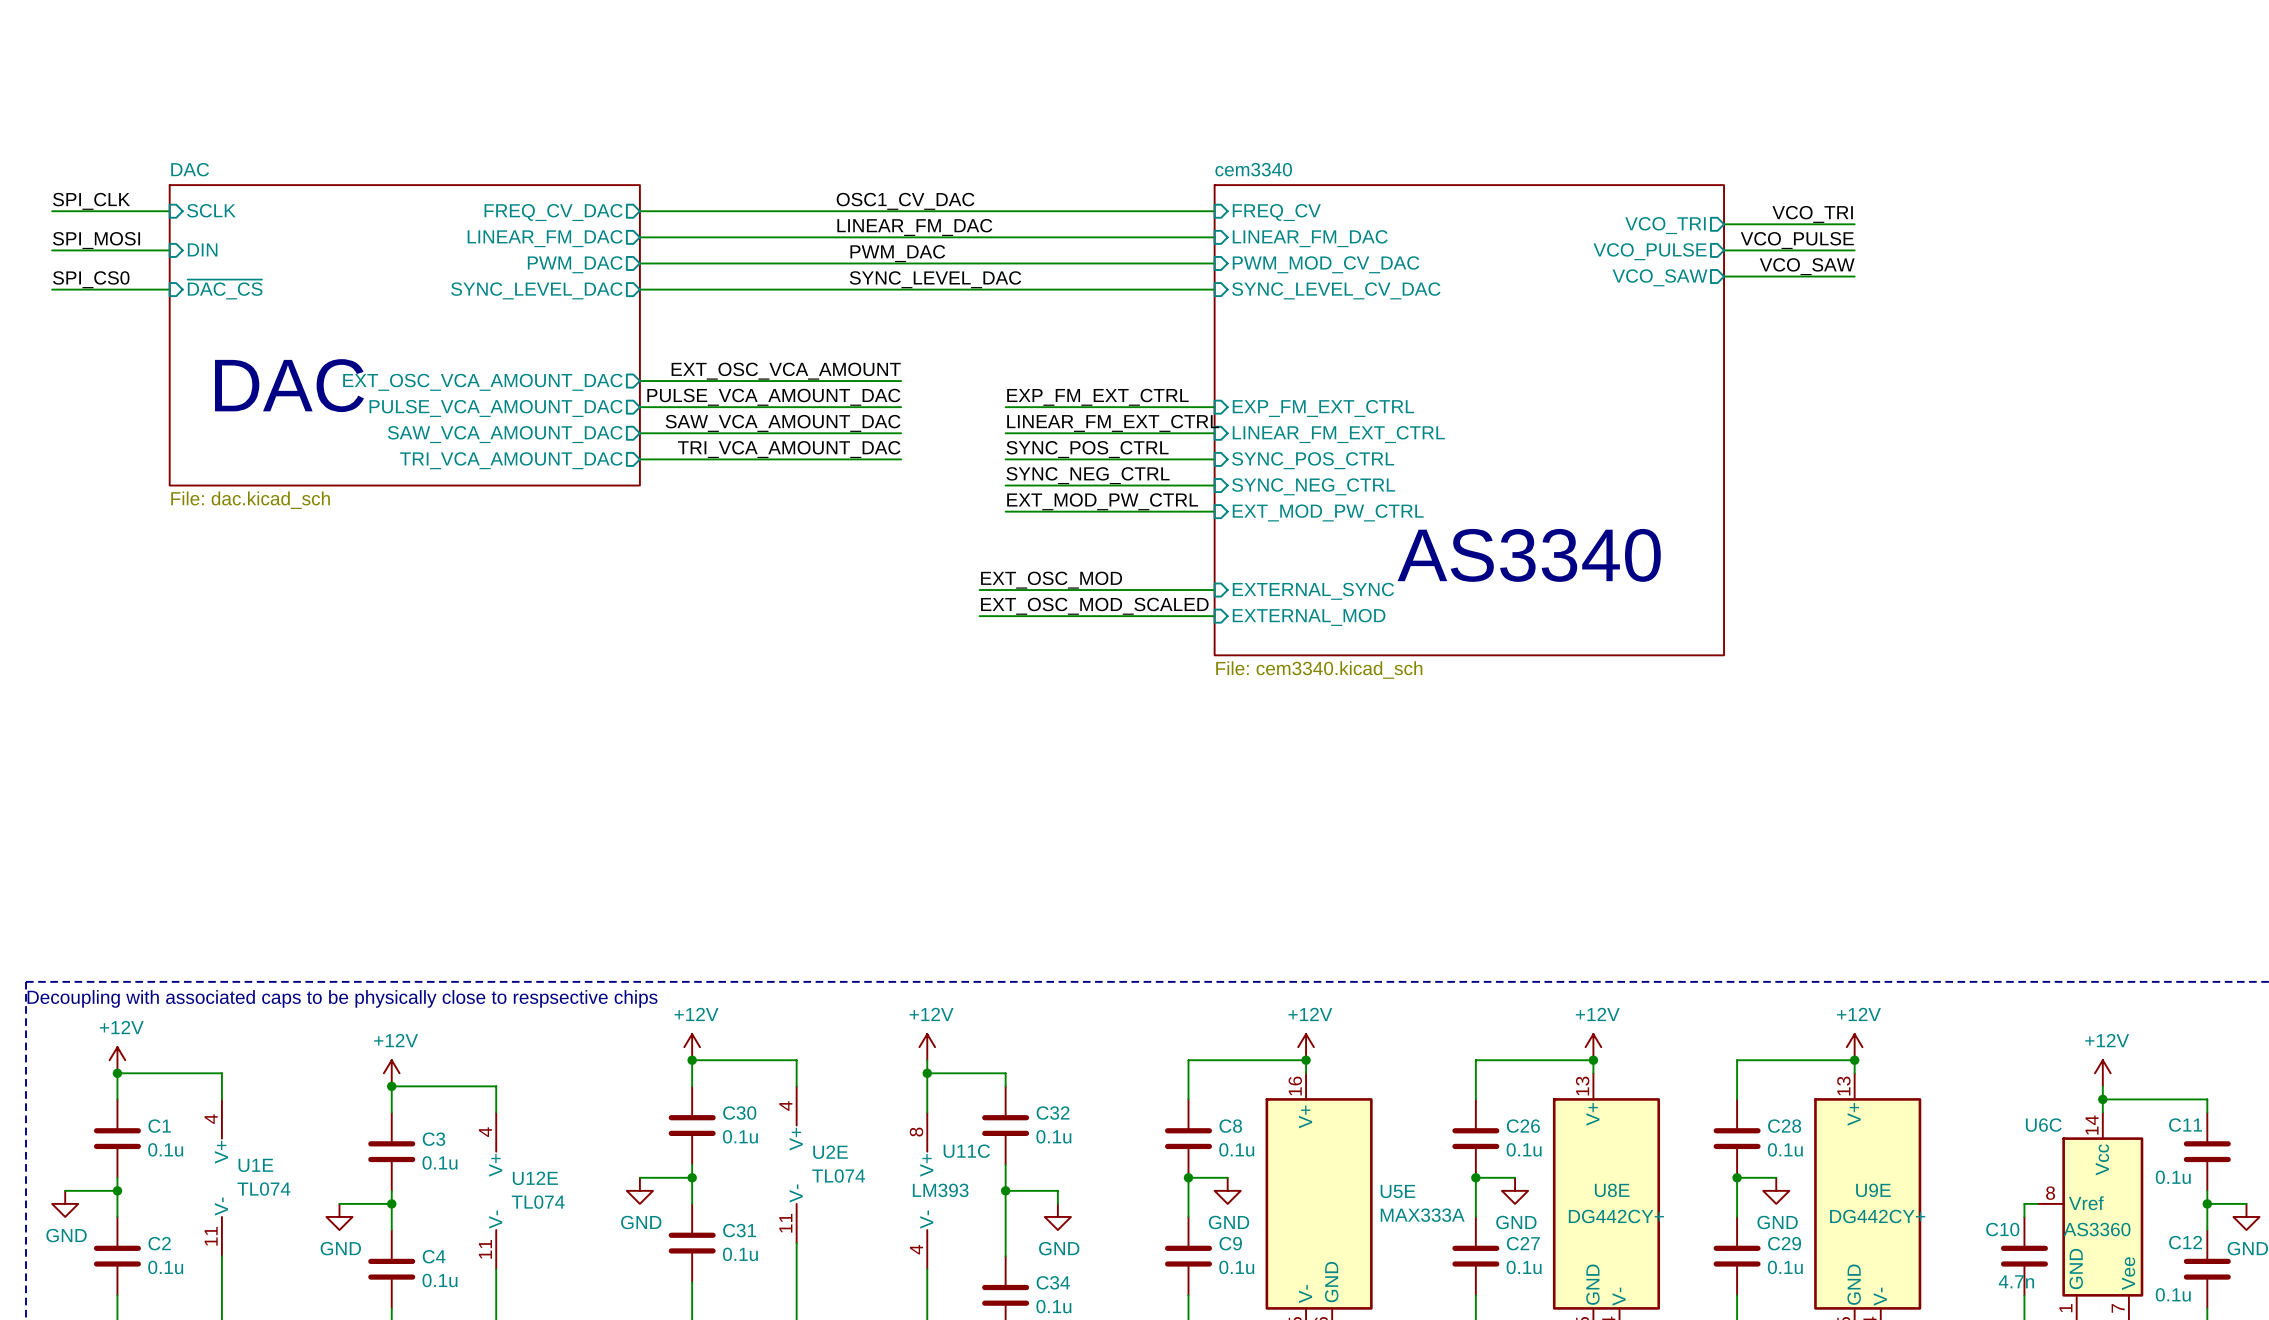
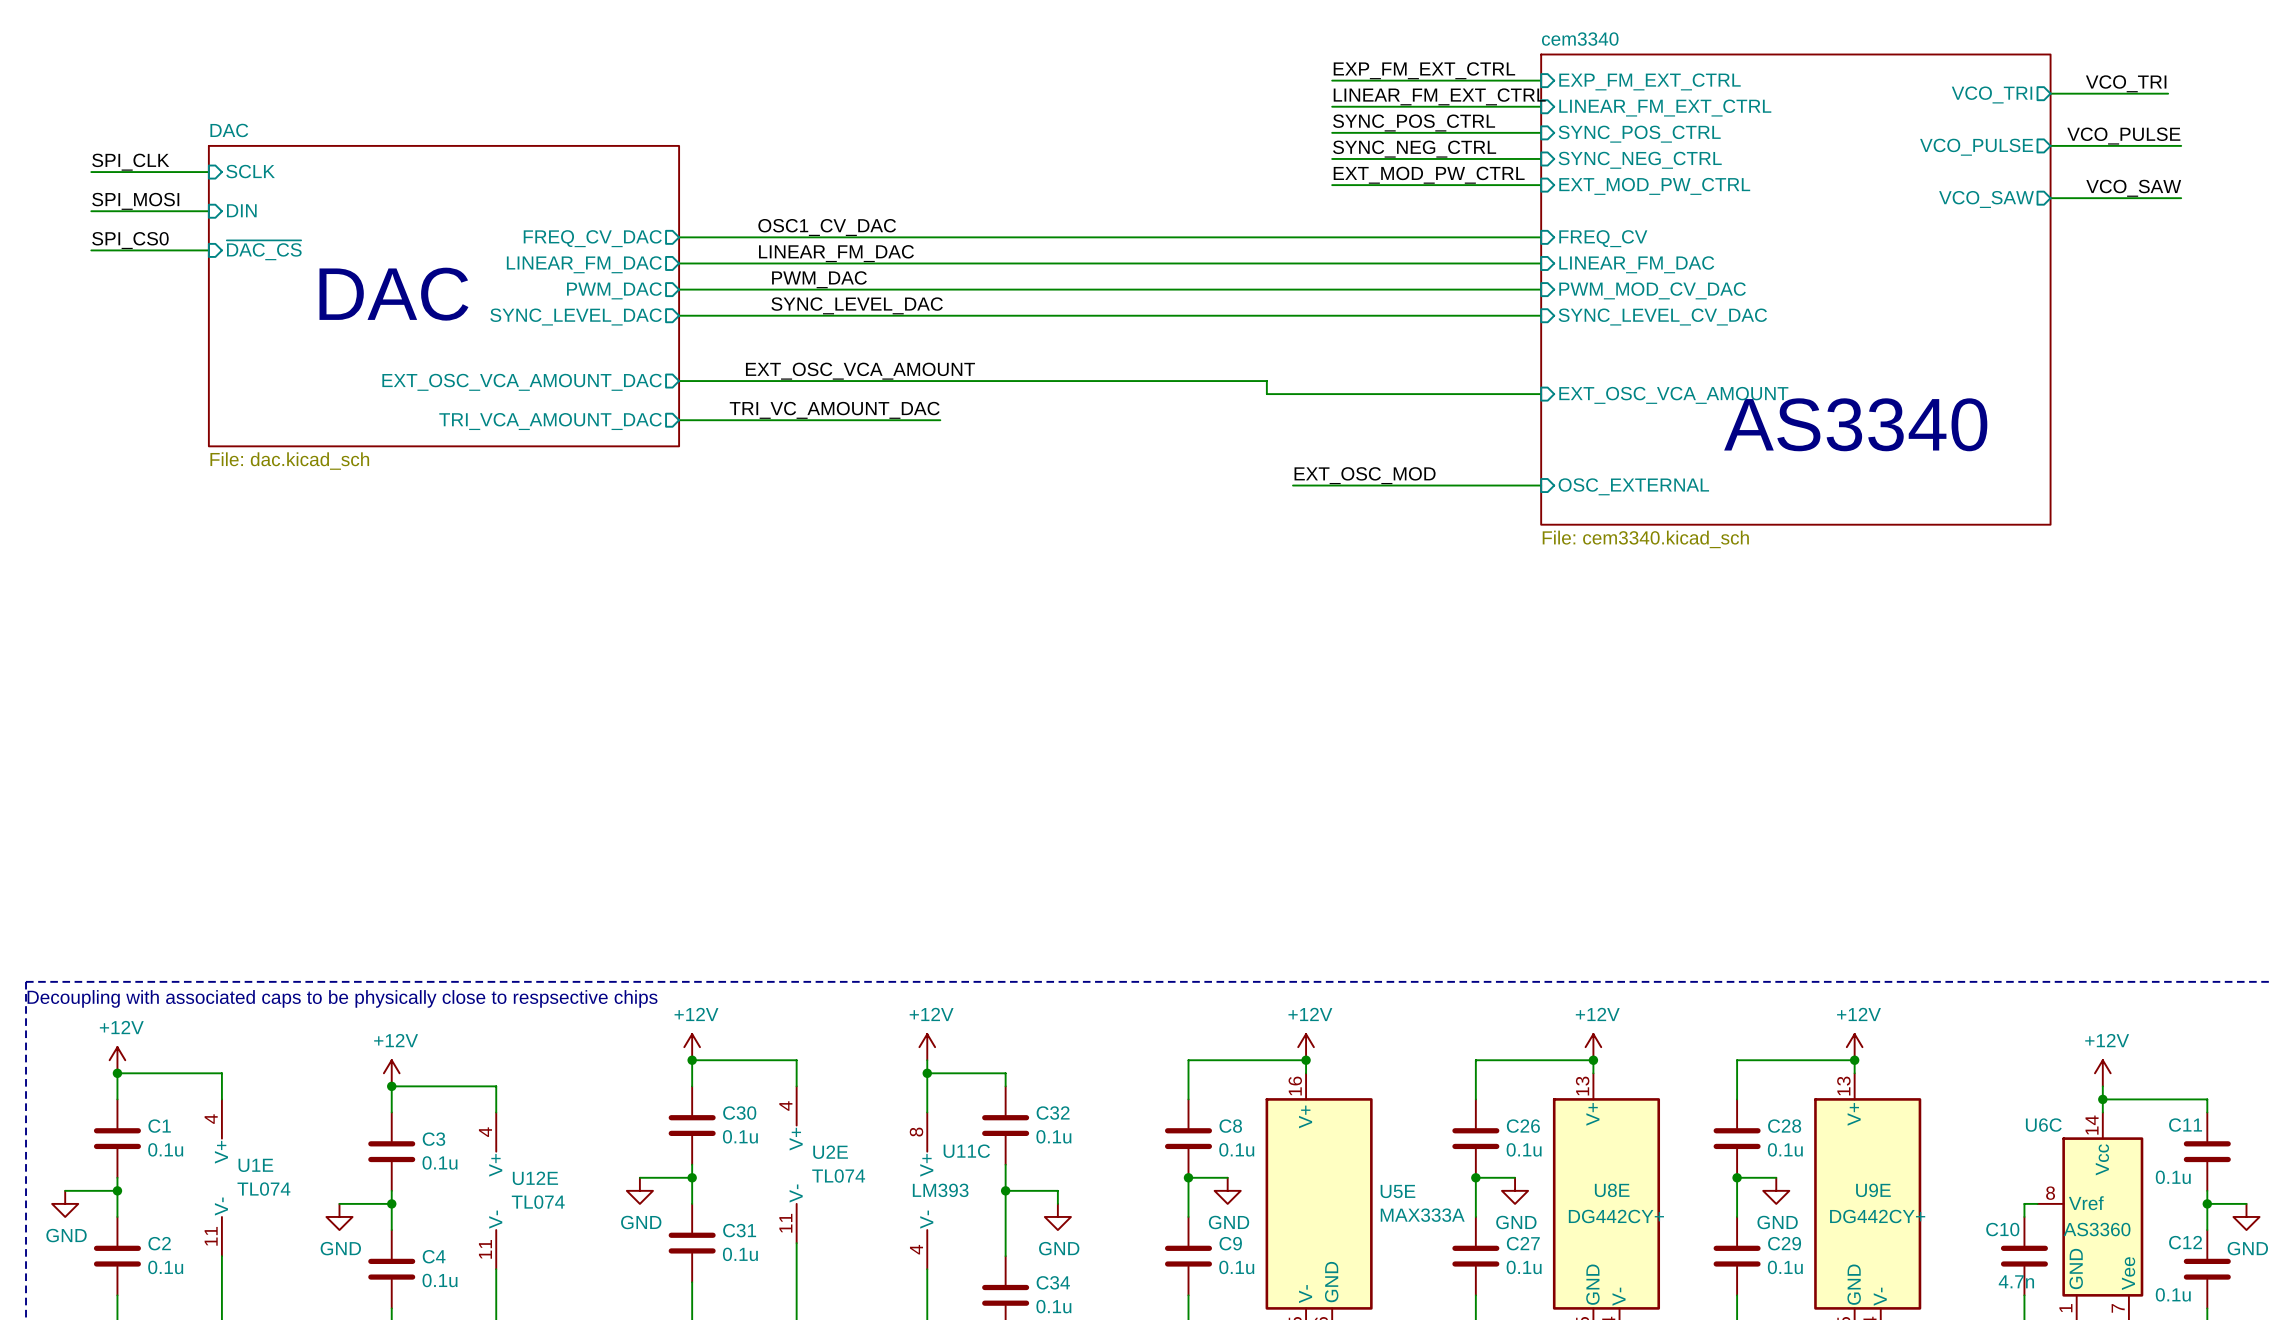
label: none -> EXP_FM_EXT_CTRL (1424, 70)
wire: none -> (1332, 80) (1541, 80)
sheet pin: none -> EXP_FM_EXT_CTRL (1650, 81)
label: none -> VCO_TRI (2126, 83)
wire: none -> (2050, 93) (2168, 93)
sheet pin: none -> VCO_TRI (1992, 94)
label: none -> LINEAR_FM_EXT_CTRL (1439, 96)
wire: none -> (1332, 106) (1541, 106)
sheet pin: none -> LINEAR_FM_EXT_CTRL (1665, 108)
label: none -> SYNC_POS_CTRL (1414, 122)
wire: none -> (1332, 132) (1541, 132)
sheet pin: none -> SYNC_POS_CTRL (1639, 134)
label: none -> VCO_PULSE (2123, 136)
wire: none -> (2050, 145) (2181, 145)
sheet pin: none -> VCO_PULSE (1976, 147)
label: none -> SYNC_NEG_CTRL (1414, 149)
wire: none -> (1332, 158) (1541, 158)
sheet pin: none -> SYNC_NEG_CTRL (1640, 160)
label: none -> EXT_MOD_PW_CTRL (1429, 175)
sheet pin: none -> EXT_MOD_PW_CTRL (1654, 186)
label: none -> VCO_SAW (2133, 188)
wire: none -> (2050, 198) (2181, 198)
sheet pin: none -> VCO_SAW (1986, 199)
label position: SPI_CLK (91, 201) -> SPI_CLK (130, 162)
label position: OSC1_CV_DAC (905, 201) -> OSC1_CV_DAC (827, 227)
sheet pin position: SCLK (211, 210) -> SCLK (250, 171)
wire: (52, 211) (91, 211) -> (169, 211) (208, 211)
wire: (639, 211) (1214, 211) -> none
sheet pin position: FREQ_CV_DAC (553, 212) -> FREQ_CV_DAC (592, 238)
sheet pin: FREQ_CV (1276, 212) -> none
label: VCO_TRI (1812, 214) -> none
wire: (1724, 224) (1854, 224) -> none
sheet pin: VCO_TRI (1665, 225) -> none
label position: LINEAR_FM_DAC (914, 227) -> LINEAR_FM_DAC (836, 253)
wire: (639, 237) (679, 237) -> none
wire: none -> (1214, 237) (1541, 237)
sheet pin position: LINEAR_FM_DAC (545, 238) -> LINEAR_FM_DAC (584, 264)
sheet pin: LINEAR_FM_DAC (1310, 238) -> none
sheet pin: none -> FREQ_CV (1603, 238)
label position: SPI_MOSI (96, 240) -> SPI_MOSI (135, 201)
label: VCO_PULSE (1797, 240) -> none
sheet pin position: DIN (202, 249) -> DIN (241, 210)
wire: (52, 250) (91, 250) -> (169, 250) (208, 250)
wire: (1724, 250) (1854, 250) -> none
sheet pin: VCO_PULSE (1650, 251) -> none
label position: PWM_DAC (897, 253) -> PWM_DAC (819, 279)
wire: (639, 263) (679, 263) -> none
wire: none -> (1214, 263) (1541, 263)
sheet pin position: PWM_DAC (575, 264) -> PWM_DAC (614, 290)
sheet pin: PWM_MOD_CV_DAC (1326, 264) -> none
sheet pin: none -> LINEAR_FM_DAC (1636, 264)
label: VCO_SAW (1807, 266) -> none
wire: (1724, 276) (1854, 276) -> none
sheet pin: VCO_SAW (1659, 277) -> none
label position: SPI_CS0 (91, 279) -> SPI_CS0 (130, 240)
label position: SYNC_LEVEL_DAC (935, 279) -> SYNC_LEVEL_DAC (857, 305)
wire: (52, 289) (169, 289) -> (91, 172) (208, 172)
sheet pin position: ~{DAC_CS} (225, 289) -> ~{DAC_CS} (264, 250)
wire: (639, 289) (679, 289) -> none
wire: none -> (1214, 289) (1541, 289)
sheet pin position: SYNC_LEVEL_DAC (536, 290) -> SYNC_LEVEL_DAC (576, 317)
sheet pin: SYNC_LEVEL_CV_DAC (1336, 290) -> none
sheet pin: none -> PWM_MOD_CV_DAC (1652, 290)
wire: none -> (679, 315) (1541, 315)
sheet pin: none -> SYNC_LEVEL_CV_DAC (1662, 317)
sheet DAC position: (404, 335) -> (443, 296)
label position: EXT_OSC_VCA_AMOUNT (786, 371) -> EXT_OSC_VCA_AMOUNT (860, 371)
wire: (639, 381) (679, 381) -> none
wire: none -> (901, 381) (1266, 381) (1266, 394) (1541, 394)
sheet pin position: EXT_OSC_VCA_AMOUNT_DAC (482, 382) -> EXT_OSC_VCA_AMOUNT_DAC (522, 382)
text position: DAC (289, 385) -> DAC (393, 294)
sheet pin: none -> EXT_OSC_VCA_AMOUNT (1673, 395)
label: PULSE_VCA_AMOUNT_DAC (773, 397) -> none
label: EXP_FM_EXT_CTRL (1097, 397) -> none
wire: (639, 407) (901, 407) -> none
wire: (1005, 407) (1214, 407) -> none
sheet pin: PULSE_VCA_AMOUNT_DAC (496, 408) -> none
sheet pin: EXP_FM_EXT_CTRL (1323, 408) -> none
label: none -> TRI_VC_AMOUNT_DAC (834, 410)
sheet cem3340 position: (1469, 420) -> (1795, 289)
label: SAW_VCA_AMOUNT_DAC (783, 423) -> none
label: LINEAR_FM_EXT_CTRL (1113, 423) -> none
text: none -> AS3340 (1855, 424)
wire: (639, 433) (901, 433) -> (679, 420) (940, 420)
wire: (1005, 433) (1214, 433) -> none
sheet pin: SAW_VCA_AMOUNT_DAC (505, 434) -> none
sheet pin: LINEAR_FM_EXT_CTRL (1338, 434) -> none
label: TRI_VCA_AMOUNT_DAC (789, 449) -> none
label: SYNC_POS_CTRL (1087, 449) -> none
wire: (639, 459) (901, 459) -> none
wire: (1005, 459) (1214, 459) -> none
sheet pin position: TRI_VCA_AMOUNT_DAC (511, 460) -> TRI_VCA_AMOUNT_DAC (550, 421)
sheet pin: SYNC_POS_CTRL (1313, 460) -> none
label: SYNC_NEG_CTRL (1088, 475) -> none
label: none -> EXT_OSC_MOD (1365, 475)
wire: (1005, 485) (1214, 485) -> none
wire: none -> (1292, 485) (1541, 485)
sheet pin: SYNC_NEG_CTRL (1313, 486) -> none
sheet pin: none -> OSC_EXTERNAL (1633, 486)
label: EXT_MOD_PW_CTRL (1102, 501) -> none
wire: (1005, 511) (1214, 511) -> none
sheet pin: EXT_MOD_PW_CTRL (1328, 512) -> none
text: AS3340 (1529, 555) -> none
label: EXT_OSC_MOD (1051, 580) -> none
wire: (979, 590) (1214, 590) -> none
sheet pin: EXTERNAL_SYNC (1313, 591) -> none
label: EXT_OSC_MOD_SCALED (1094, 606) -> none
wire: (979, 616) (1214, 616) -> none
sheet pin: EXTERNAL_MOD (1309, 617) -> none

